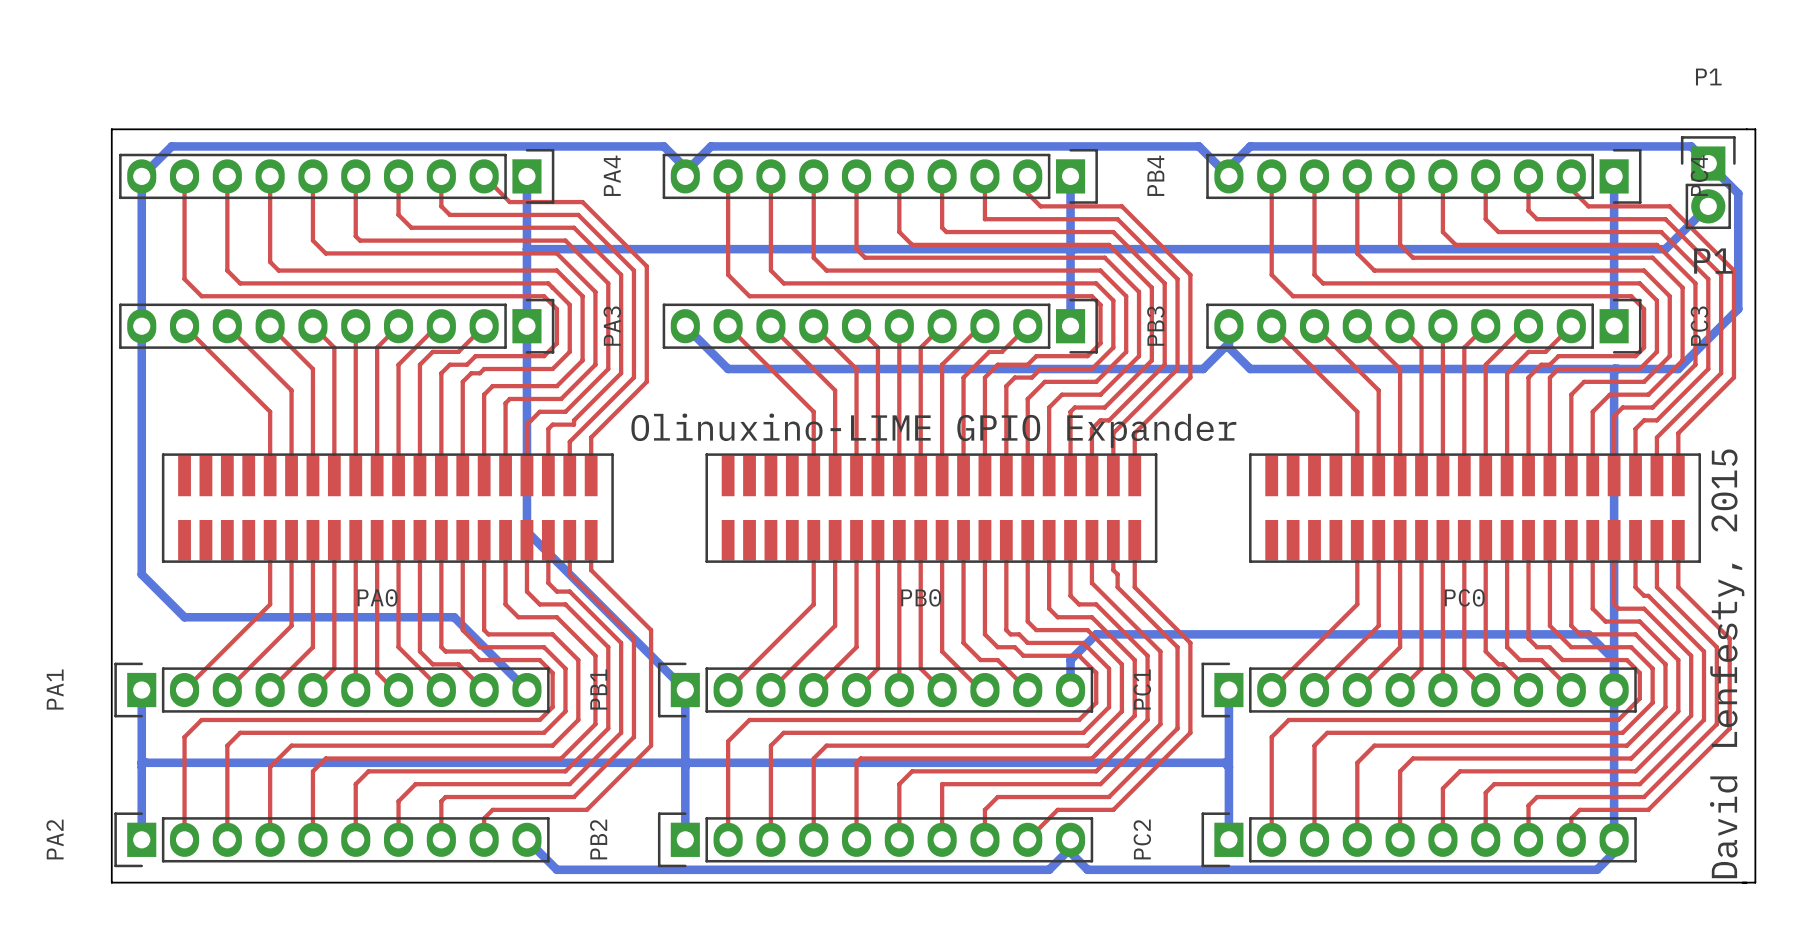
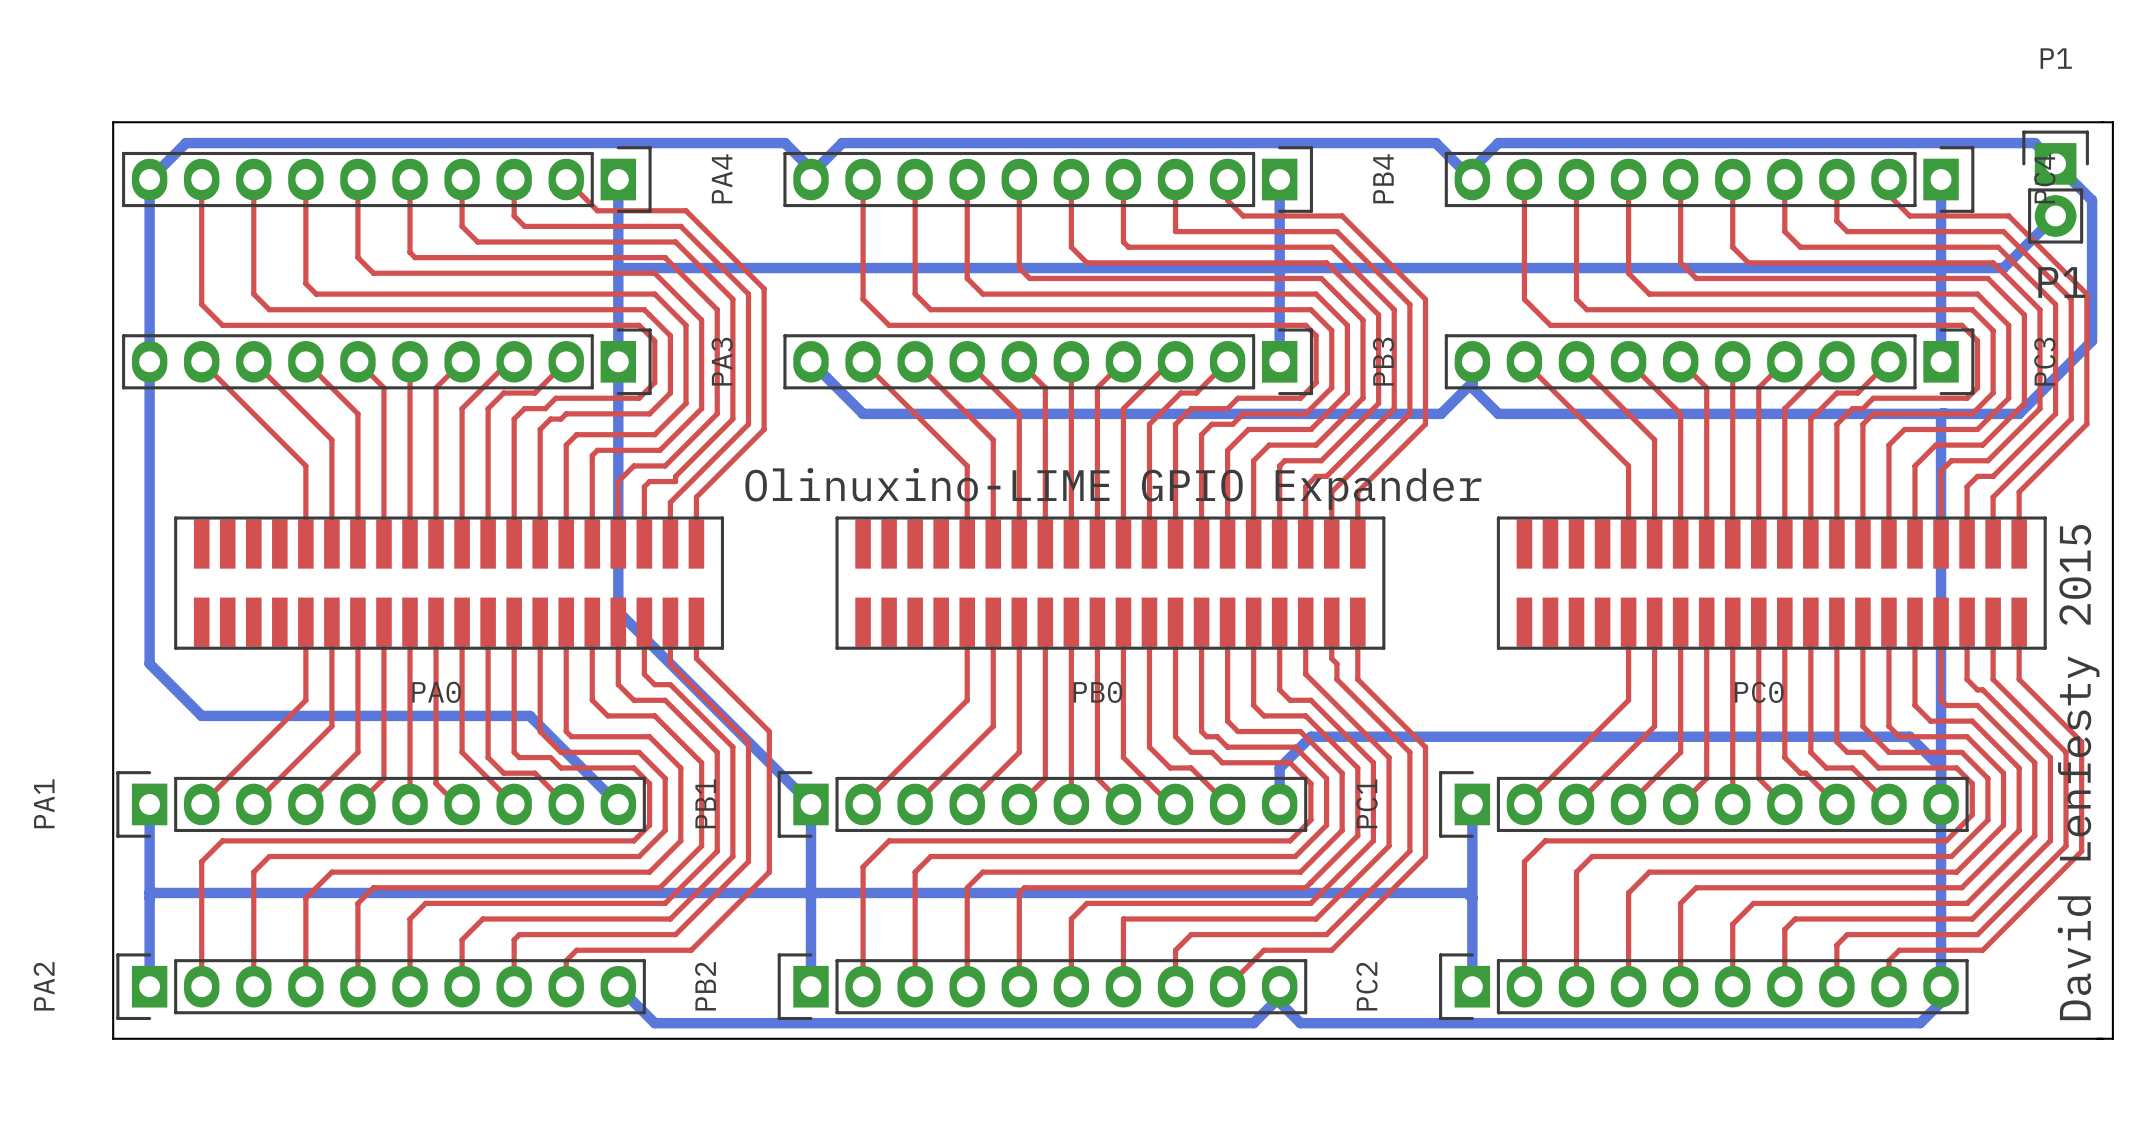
text: David Lenfesty, 2015 (1727, 663) -> David Lenfesty 2015 (2078, 772)

